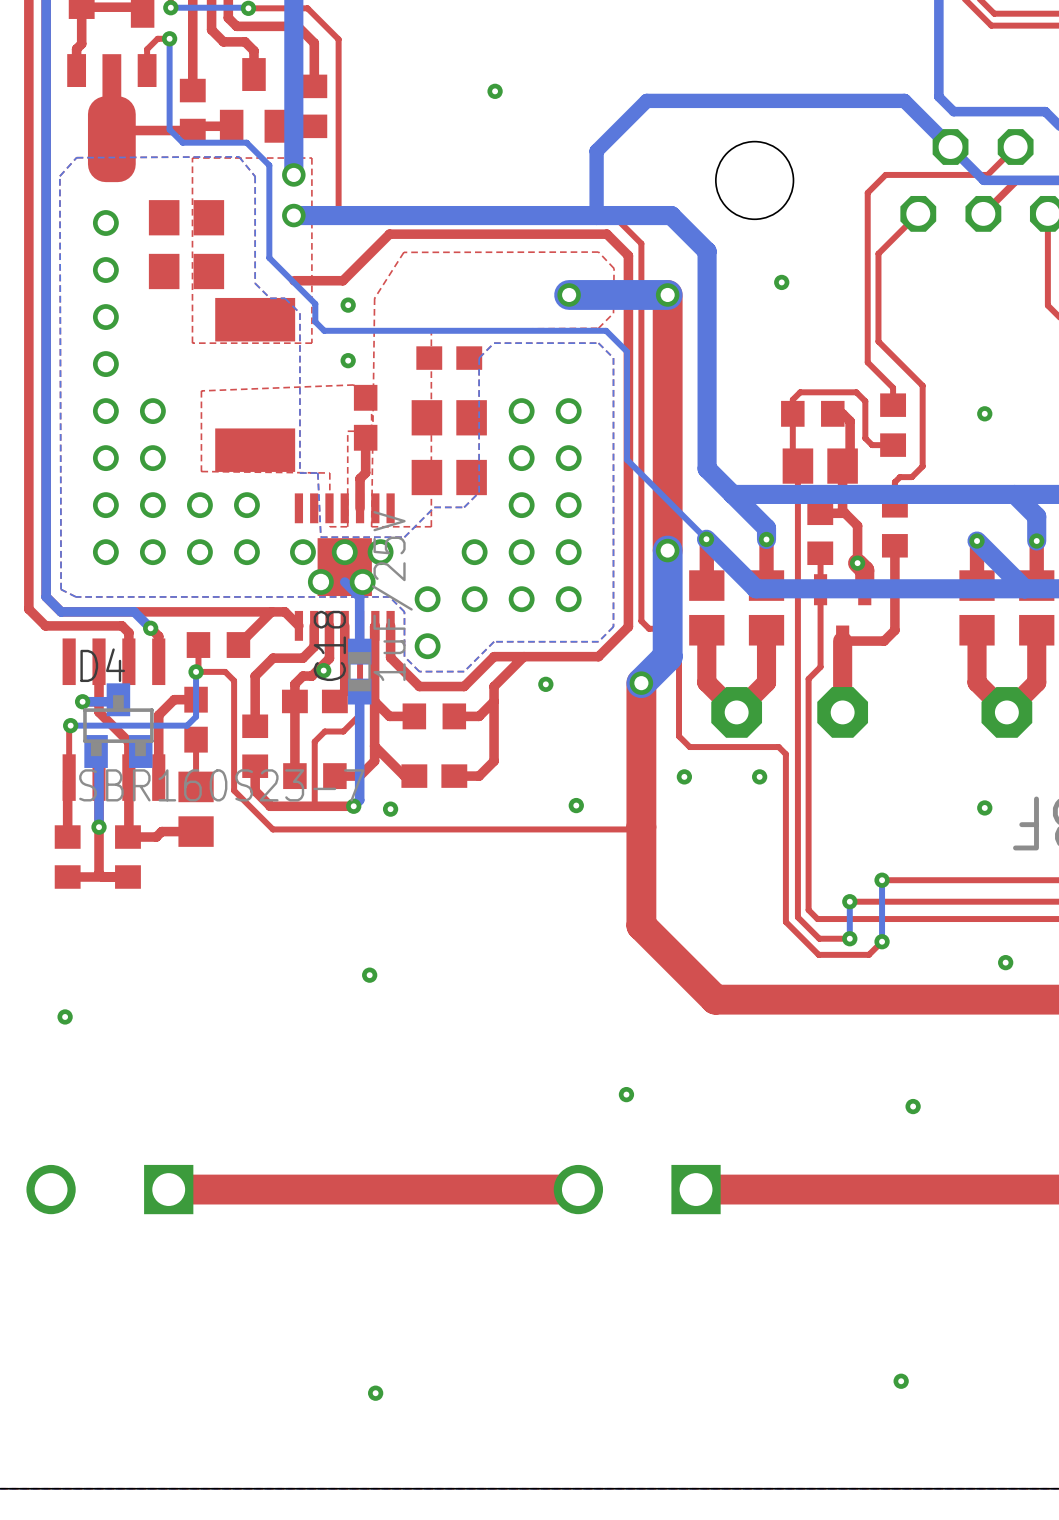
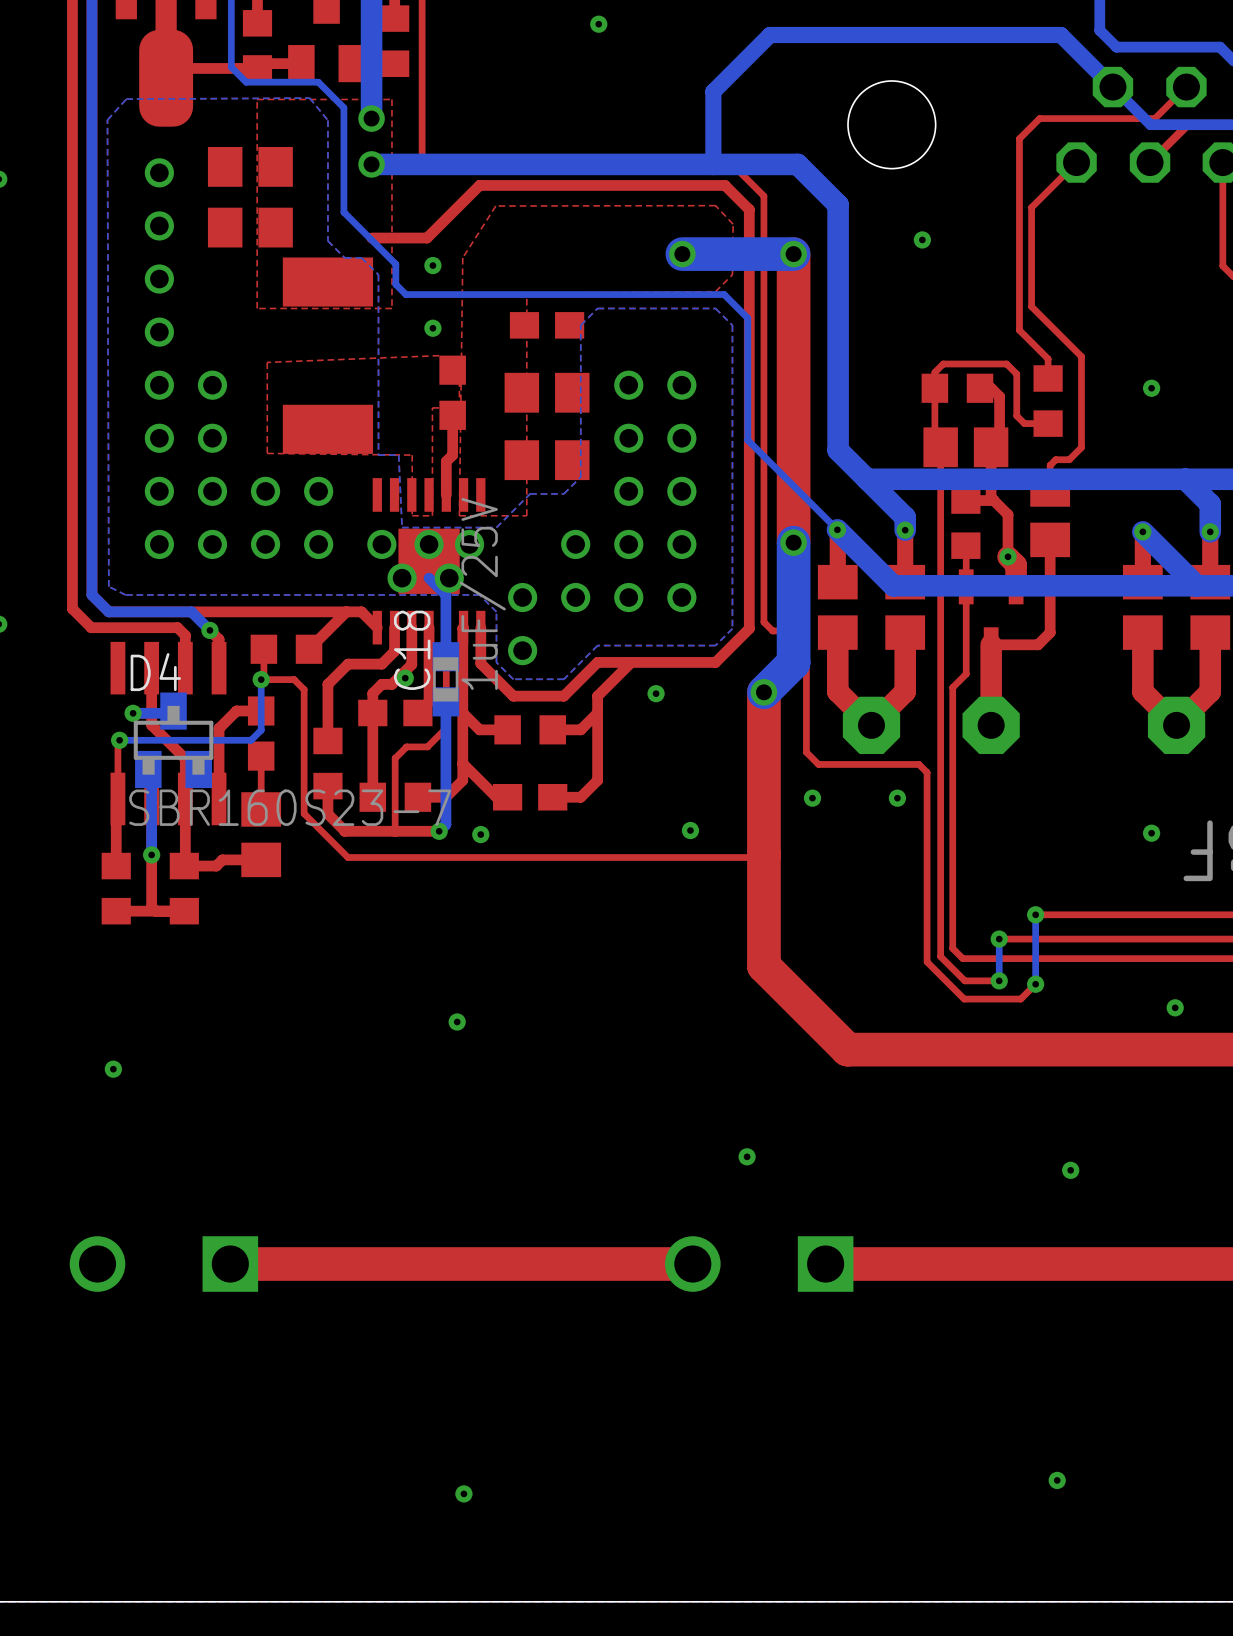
part footprint: [881, 494, 908, 558] -> [1030, 472, 1071, 558]

